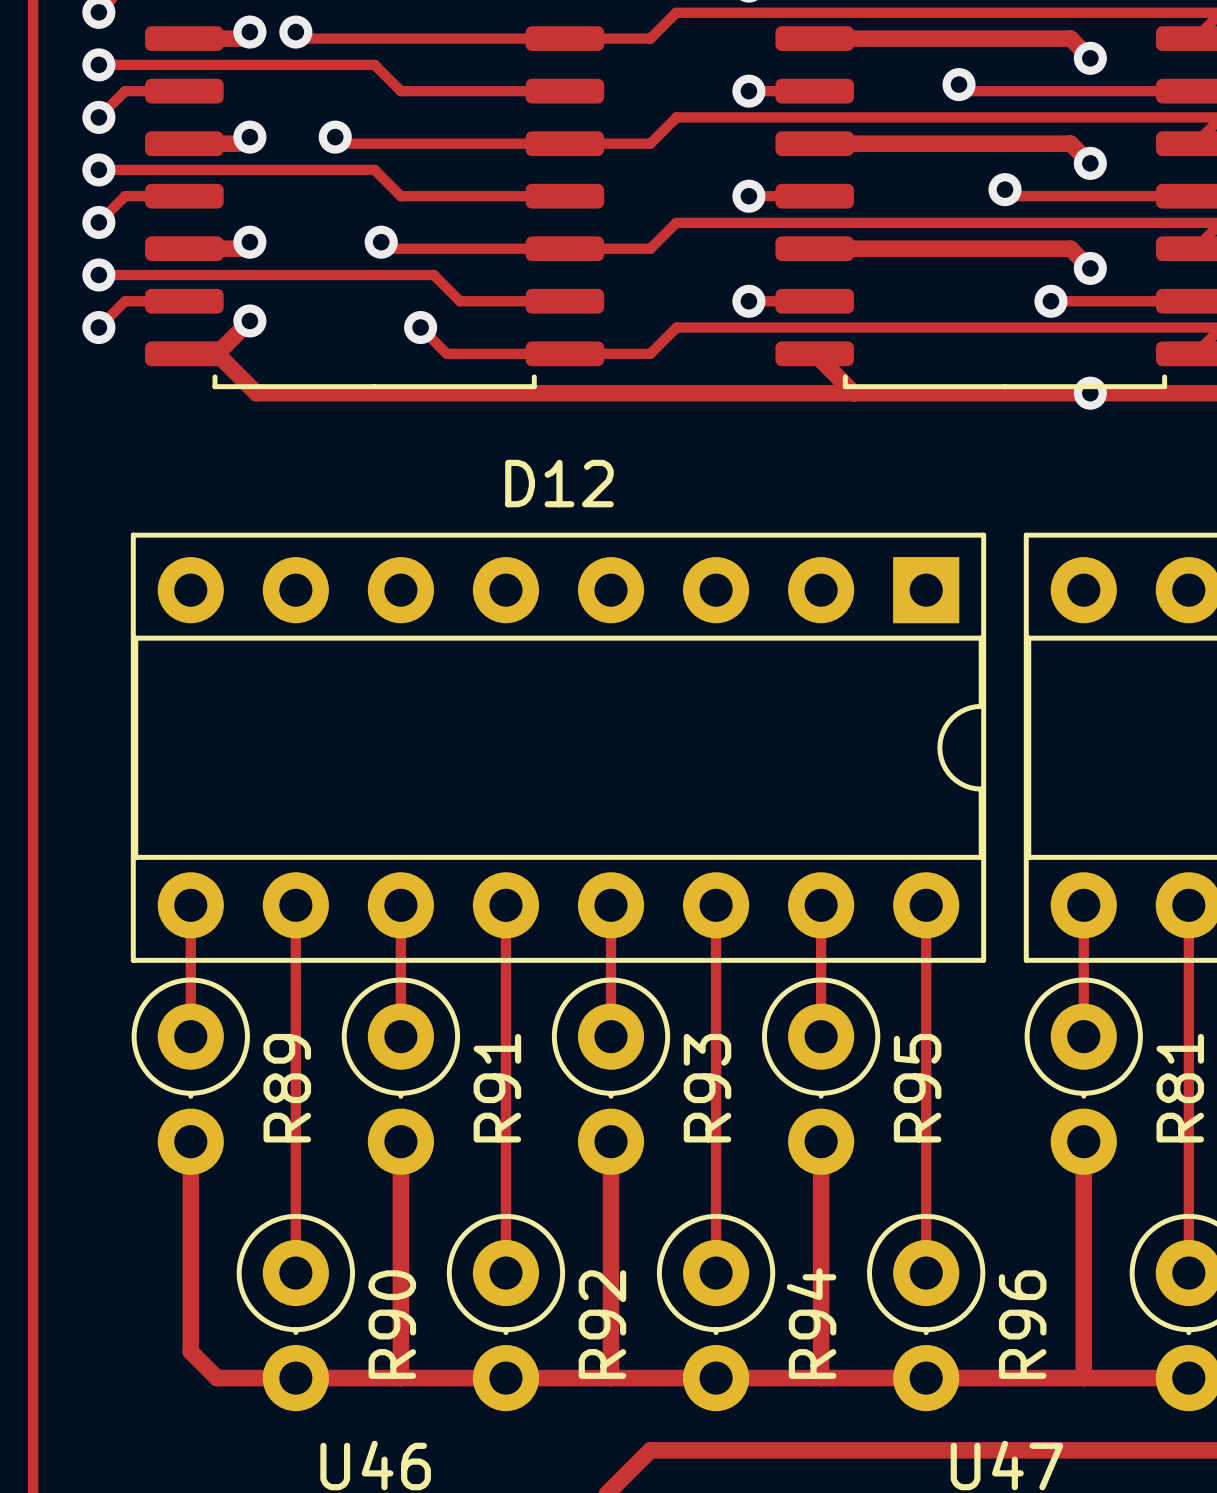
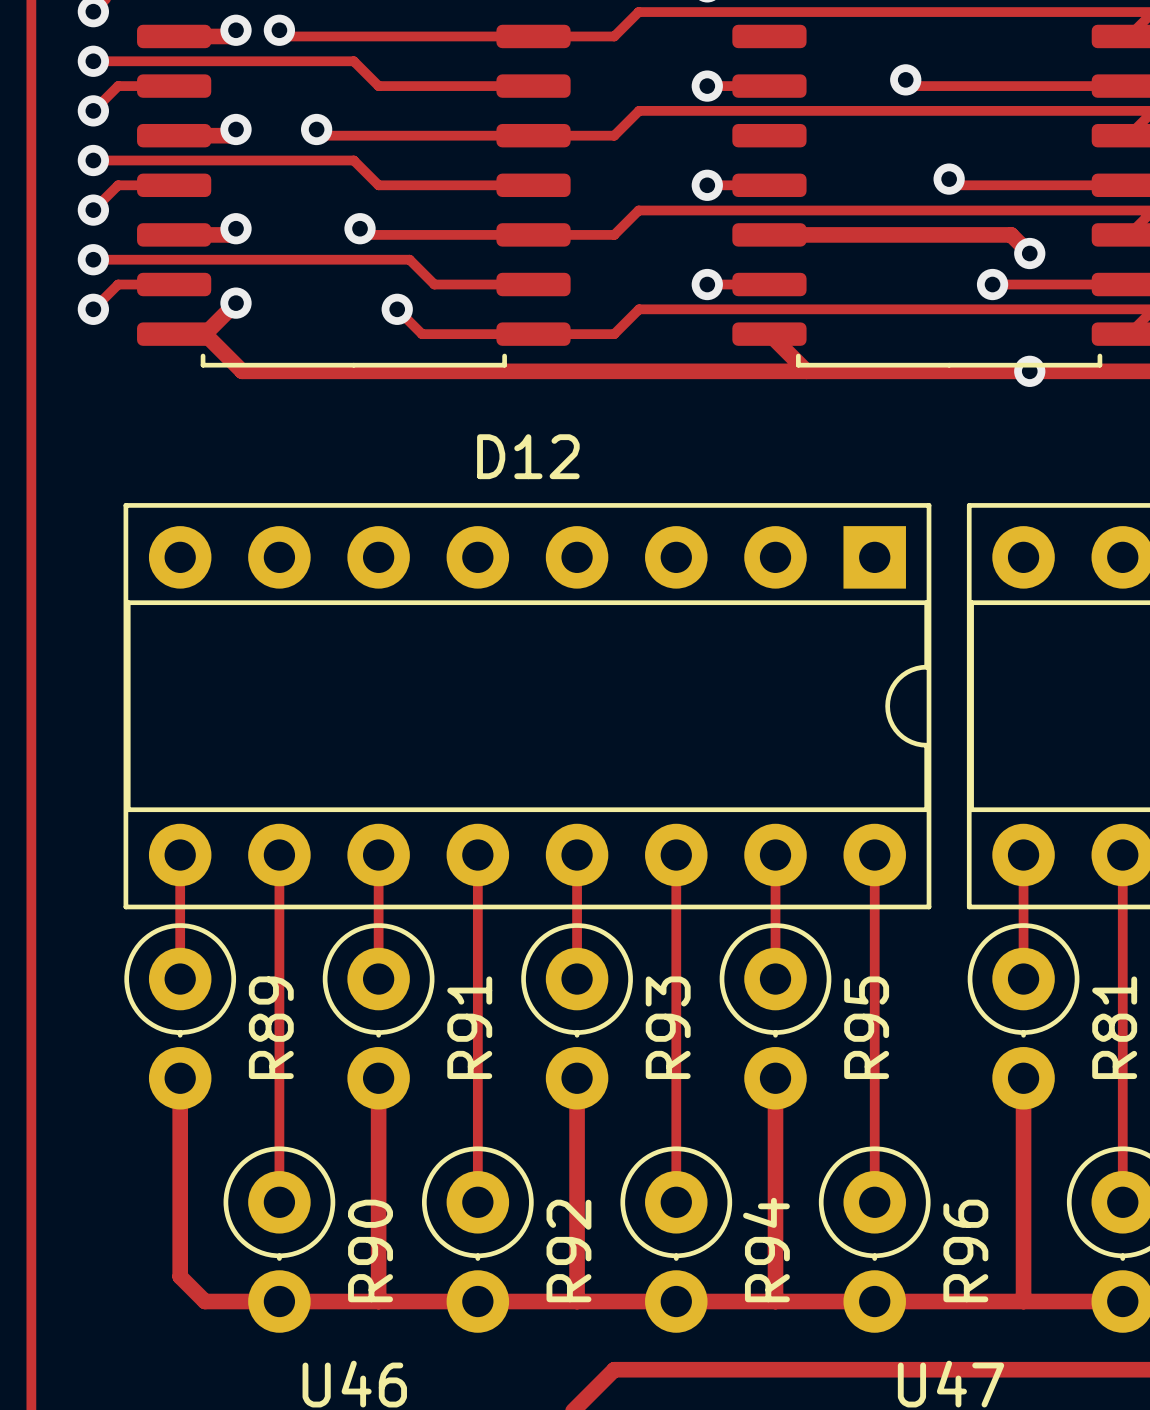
track: (814, 38) (1070, 38) (1090, 58) -> none
via: (1090, 58) -> none
track: (814, 143) (1070, 143) (1090, 163) -> none
via: (1090, 163) -> none

